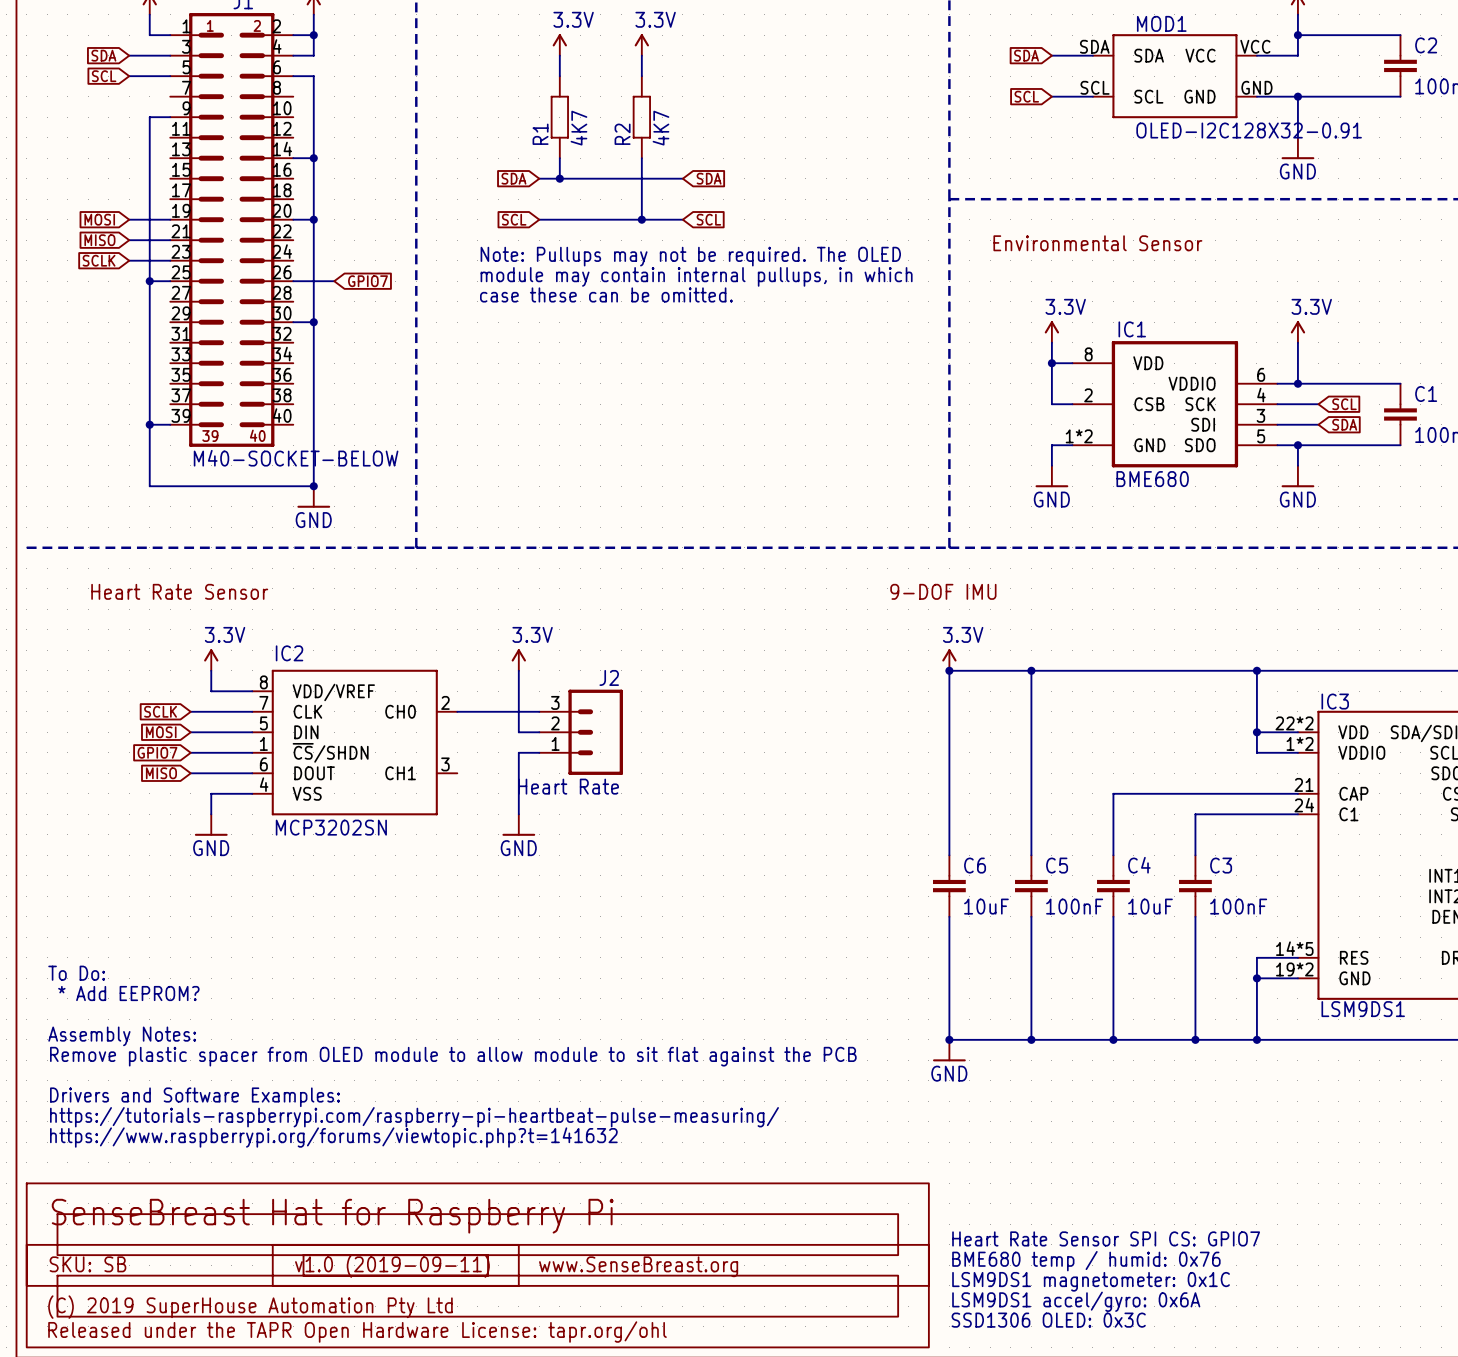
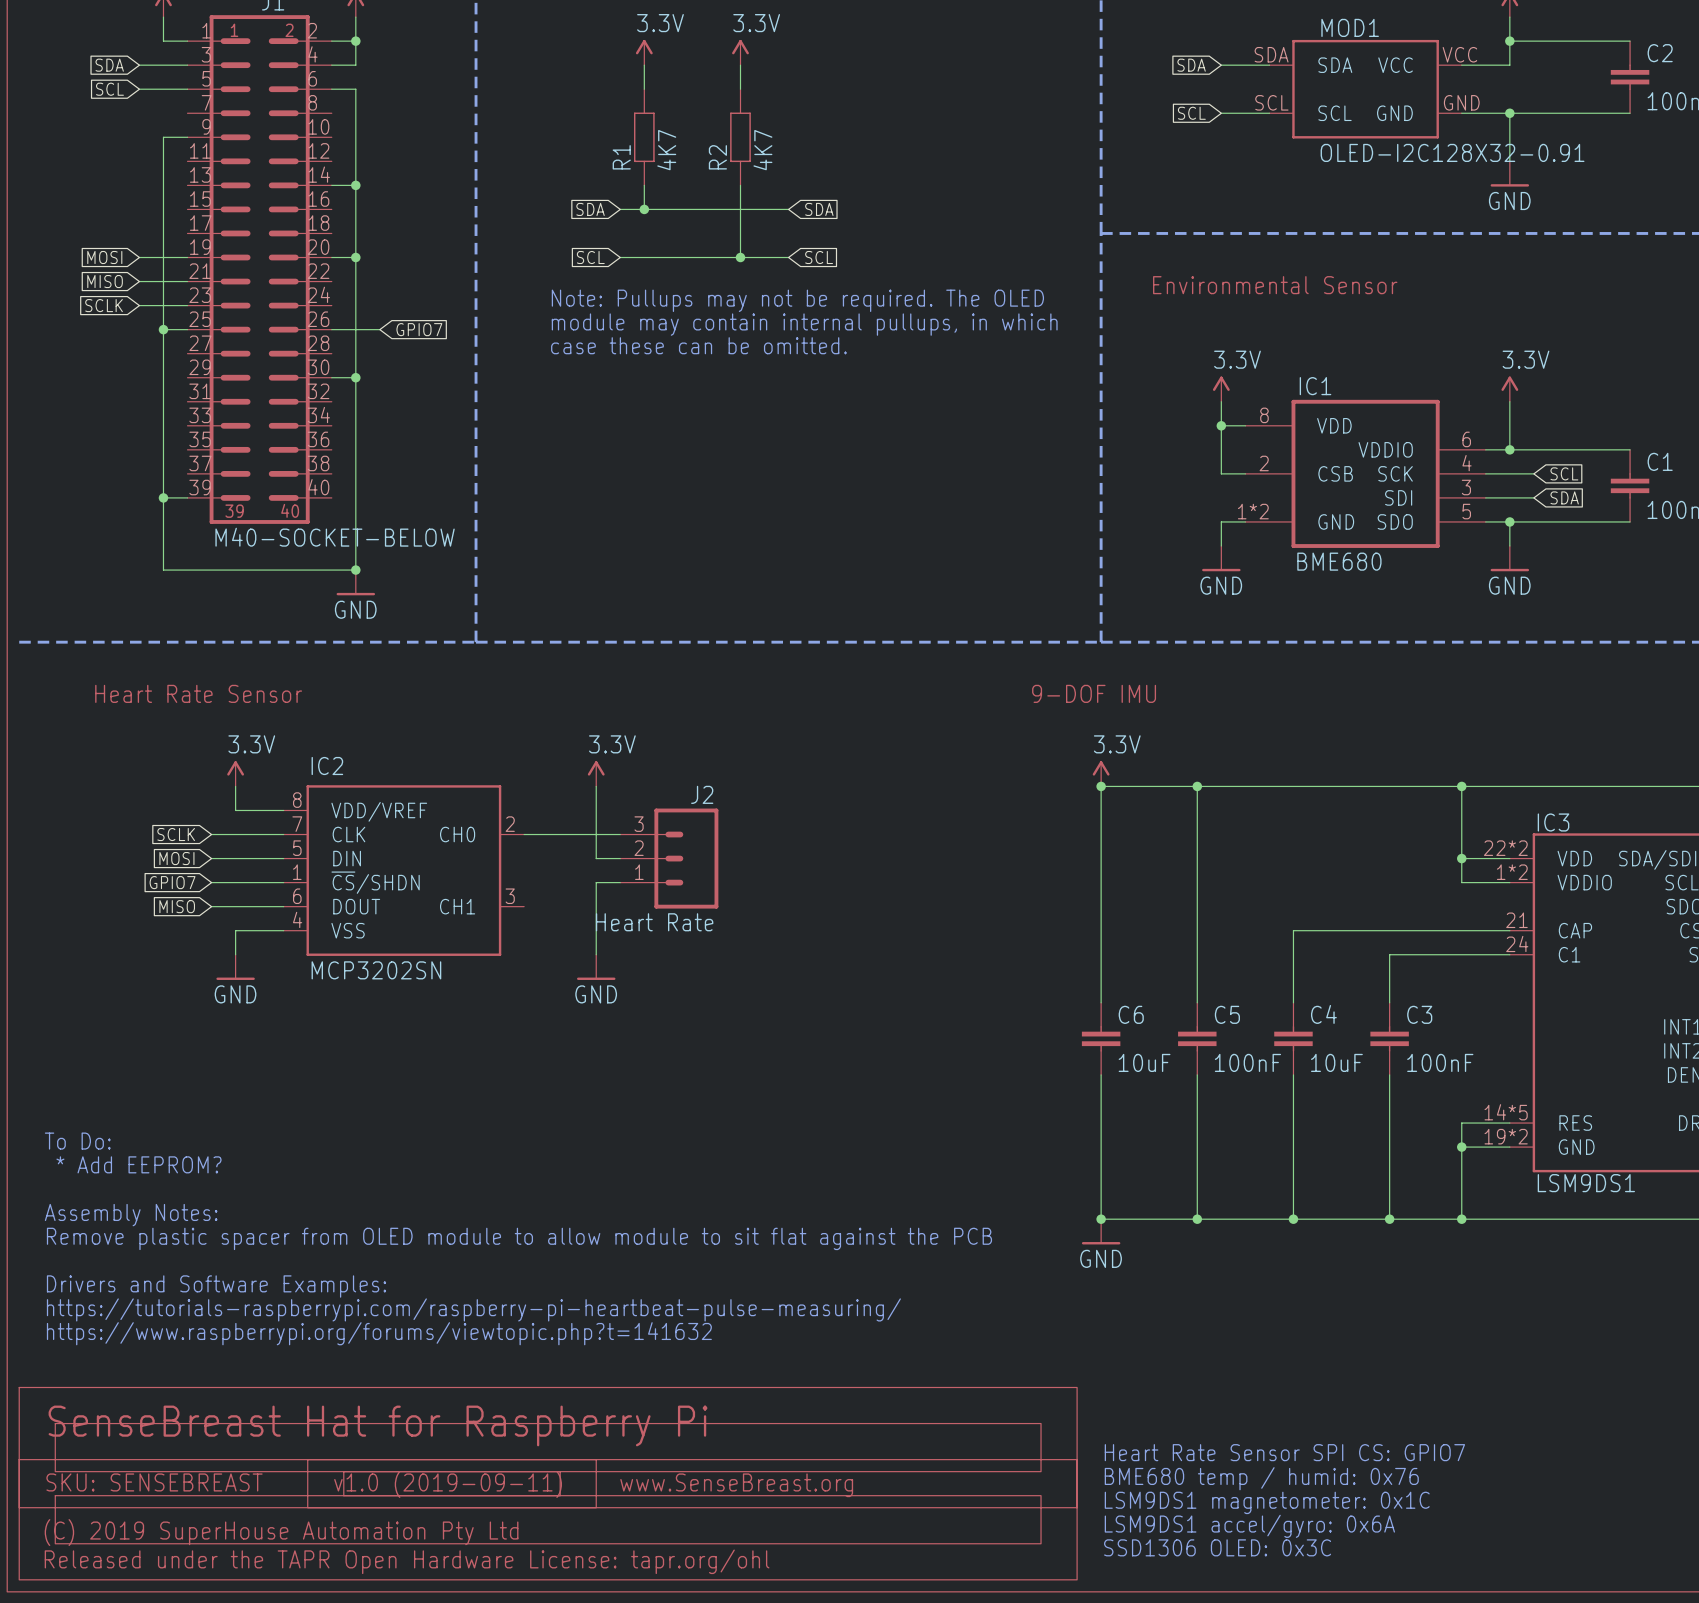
text: SKU: SB (87, 1264) -> SKU: SENSEBREAST (154, 1482)

